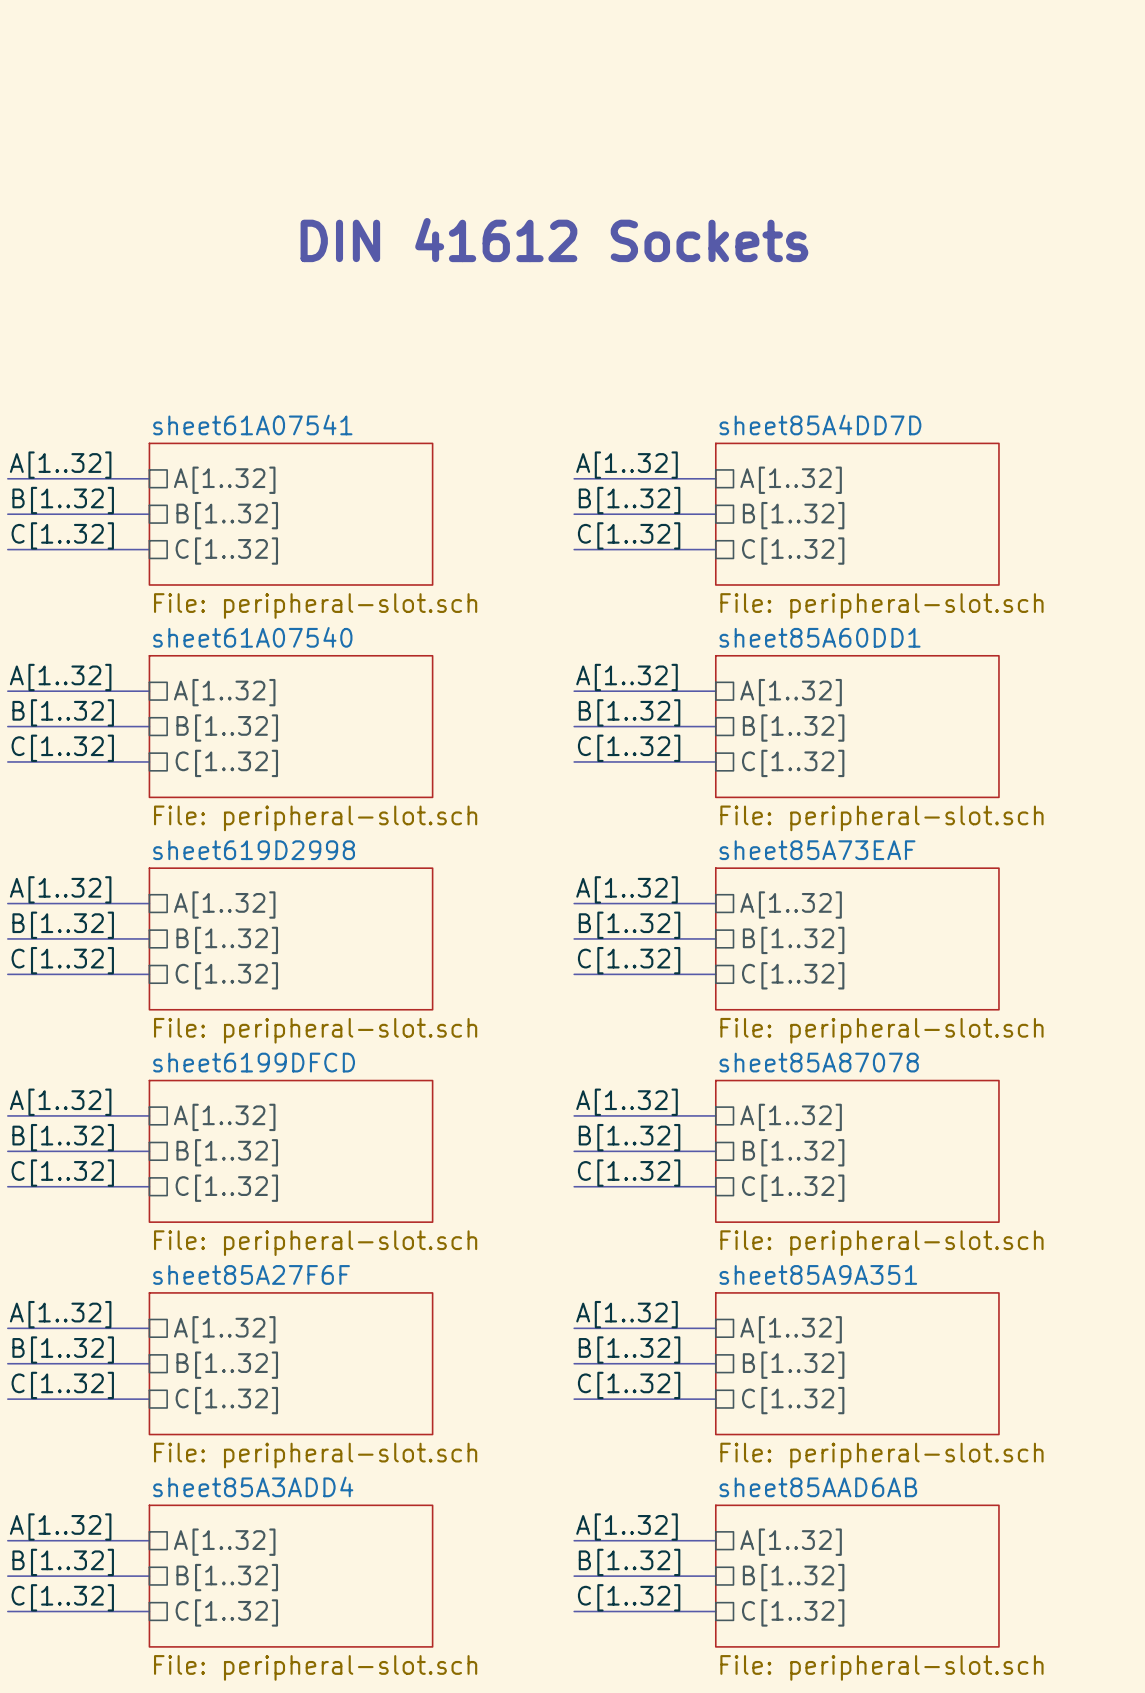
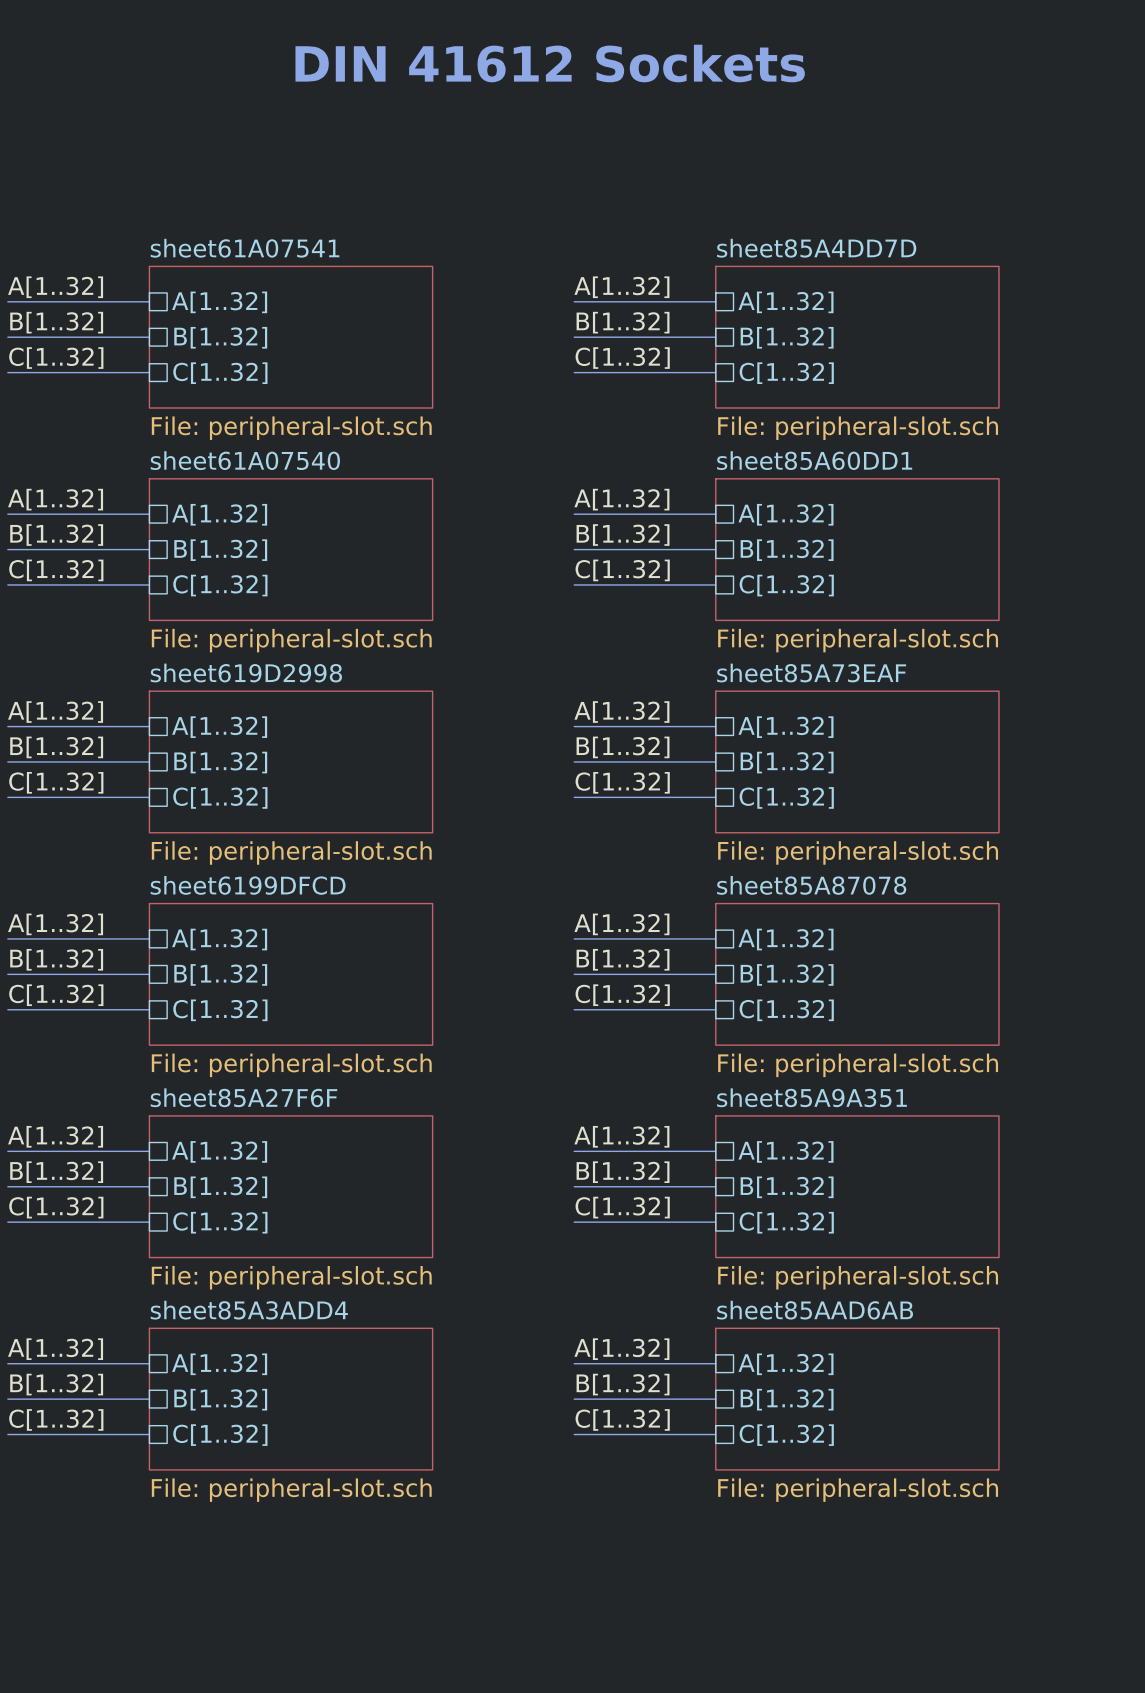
text position: DIN 41612 Sockets (554, 240) -> DIN 41612 Sockets (550, 63)
bus: none -> (7, 301) (149, 301)
bus: none -> (574, 301) (715, 301)
label: none -> B[1..32] (56, 322)
label: none -> B[1..32] (623, 322)
bus: none -> (7, 337) (149, 337)
bus: none -> (574, 337) (715, 337)
sheet pin: none -> B[1..32] (220, 337)
sheet pin: none -> B[1..32] (787, 337)
label: none -> C[1..32] (56, 358)
label: none -> C[1..32] (622, 358)
sheet pin: none -> C[1..32] (220, 373)
sheet pin: none -> C[1..32] (786, 373)
label position: A[1..32] (60, 465) -> A[1..32] (55, 287)
label position: A[1..32] (627, 465) -> A[1..32] (621, 287)
bus: (7, 478) (149, 478) -> (7, 372) (149, 372)
bus: (574, 478) (715, 478) -> (574, 372) (715, 372)
sheet pin position: A[1..32] (224, 480) -> A[1..32] (219, 302)
sheet pin position: A[1..32] (791, 480) -> A[1..32] (785, 302)
label: B[1..32] (63, 500) -> A[1..32] (55, 499)
label: B[1..32] (629, 500) -> A[1..32] (621, 499)
sheet sheet61A07541 position: (291, 514) -> (291, 337)
sheet sheet85A4DD7D position: (857, 514) -> (857, 337)
sheet pin: B[1..32] (227, 515) -> A[1..32] (219, 514)
sheet pin: B[1..32] (793, 515) -> A[1..32] (785, 514)
label: C[1..32] (62, 535) -> B[1..32] (56, 535)
label: C[1..32] (629, 535) -> B[1..32] (623, 535)
sheet pin: C[1..32] (226, 551) -> B[1..32] (220, 550)
sheet pin: C[1..32] (793, 551) -> B[1..32] (787, 550)
label: none -> C[1..32] (56, 570)
label: none -> C[1..32] (622, 570)
sheet pin: none -> C[1..32] (220, 585)
sheet pin: none -> C[1..32] (786, 585)
label: A[1..32] (60, 677) -> none
label: A[1..32] (627, 677) -> none
bus: (7, 691) (149, 691) -> (7, 584) (149, 584)
bus: (574, 691) (715, 691) -> (574, 584) (715, 584)
sheet pin: A[1..32] (224, 692) -> none
sheet pin: A[1..32] (791, 692) -> none
label: B[1..32] (63, 712) -> A[1..32] (55, 712)
label: B[1..32] (629, 712) -> A[1..32] (621, 712)
sheet sheet61A07540 position: (291, 726) -> (291, 549)
sheet sheet85A60DD1 position: (857, 726) -> (857, 549)
sheet pin: B[1..32] (227, 728) -> A[1..32] (219, 727)
sheet pin: B[1..32] (793, 728) -> A[1..32] (785, 727)
label: C[1..32] (62, 748) -> B[1..32] (56, 747)
label: C[1..32] (629, 748) -> B[1..32] (623, 747)
sheet pin: C[1..32] (226, 763) -> B[1..32] (220, 762)
sheet pin: C[1..32] (793, 763) -> B[1..32] (787, 762)
label: none -> C[1..32] (56, 782)
label: none -> C[1..32] (622, 782)
sheet pin: none -> C[1..32] (220, 797)
sheet pin: none -> C[1..32] (786, 797)
label: A[1..32] (60, 889) -> none
label: A[1..32] (627, 889) -> none
bus: (7, 903) (149, 903) -> (7, 797) (149, 797)
bus: (574, 903) (715, 903) -> (574, 797) (715, 797)
sheet pin: A[1..32] (224, 905) -> none
sheet pin: A[1..32] (791, 905) -> none
label: B[1..32] (63, 925) -> A[1..32] (55, 924)
label: B[1..32] (629, 925) -> A[1..32] (621, 924)
sheet sheet619D2998 position: (291, 938) -> (291, 761)
sheet sheet85A73EAF position: (857, 938) -> (857, 761)
sheet pin: B[1..32] (227, 940) -> A[1..32] (219, 939)
sheet pin: B[1..32] (793, 940) -> A[1..32] (785, 939)
label: C[1..32] (62, 960) -> B[1..32] (56, 959)
label: C[1..32] (629, 960) -> B[1..32] (623, 959)
sheet pin: C[1..32] (226, 975) -> B[1..32] (220, 974)
sheet pin: C[1..32] (793, 975) -> B[1..32] (787, 974)
label: none -> C[1..32] (56, 995)
label: none -> C[1..32] (622, 995)
sheet pin: none -> C[1..32] (220, 1010)
sheet pin: none -> C[1..32] (786, 1010)
label: A[1..32] (60, 1102) -> none
label: A[1..32] (627, 1102) -> none
bus: (7, 1115) (149, 1115) -> (7, 1009) (149, 1009)
bus: (574, 1115) (715, 1115) -> (574, 1009) (715, 1009)
sheet pin: A[1..32] (224, 1117) -> none
sheet pin: A[1..32] (791, 1117) -> none
label: B[1..32] (63, 1137) -> A[1..32] (55, 1136)
label: B[1..32] (629, 1137) -> A[1..32] (621, 1136)
sheet sheet6199DFCD position: (291, 1151) -> (291, 974)
sheet sheet85A87078 position: (857, 1151) -> (857, 974)
sheet pin: B[1..32] (227, 1152) -> A[1..32] (219, 1151)
sheet pin: B[1..32] (793, 1152) -> A[1..32] (785, 1151)
label: C[1..32] (62, 1173) -> B[1..32] (56, 1172)
label: C[1..32] (629, 1173) -> B[1..32] (623, 1172)
sheet pin: C[1..32] (226, 1188) -> B[1..32] (220, 1187)
sheet pin: C[1..32] (793, 1188) -> B[1..32] (787, 1187)
label: none -> C[1..32] (56, 1207)
label: none -> C[1..32] (622, 1207)
sheet pin: none -> C[1..32] (220, 1222)
sheet pin: none -> C[1..32] (786, 1222)
label: A[1..32] (60, 1314) -> none
label: A[1..32] (627, 1314) -> none
bus: (7, 1328) (149, 1328) -> (7, 1222) (149, 1222)
bus: (574, 1328) (715, 1328) -> (574, 1222) (715, 1222)
sheet pin: A[1..32] (224, 1329) -> none
sheet pin: A[1..32] (791, 1329) -> none
label: B[1..32] (63, 1350) -> A[1..32] (55, 1349)
label: B[1..32] (629, 1350) -> A[1..32] (621, 1349)
sheet sheet85A27F6F position: (291, 1363) -> (291, 1186)
sheet sheet85A9A351 position: (857, 1363) -> (857, 1186)
sheet pin: B[1..32] (227, 1365) -> A[1..32] (219, 1364)
sheet pin: B[1..32] (793, 1365) -> A[1..32] (785, 1364)
label: C[1..32] (62, 1385) -> B[1..32] (56, 1384)
label: C[1..32] (629, 1385) -> B[1..32] (623, 1384)
sheet pin: C[1..32] (226, 1400) -> B[1..32] (220, 1399)
sheet pin: C[1..32] (793, 1400) -> B[1..32] (787, 1399)
label: A[1..32] (60, 1527) -> none
label: A[1..32] (627, 1527) -> none
bus: (7, 1540) (149, 1540) -> (7, 1434) (149, 1434)
bus: (574, 1540) (715, 1540) -> (574, 1434) (715, 1434)
sheet pin: A[1..32] (224, 1542) -> none
sheet pin: A[1..32] (791, 1542) -> none
label: B[1..32] (63, 1562) -> none
label: B[1..32] (629, 1562) -> none
bus: (7, 1576) (149, 1576) -> none
sheet sheet85A3ADD4 position: (291, 1576) -> (291, 1399)
bus: (574, 1576) (715, 1576) -> none
sheet sheet85AAD6AB position: (857, 1576) -> (857, 1399)
sheet pin: B[1..32] (227, 1577) -> none
sheet pin: B[1..32] (793, 1577) -> none
label position: C[1..32] (62, 1597) -> C[1..32] (56, 1419)
label position: C[1..32] (629, 1597) -> C[1..32] (622, 1419)
bus: (7, 1611) (149, 1611) -> none
bus: (574, 1611) (715, 1611) -> none
sheet pin position: C[1..32] (226, 1612) -> C[1..32] (220, 1435)
sheet pin position: C[1..32] (793, 1612) -> C[1..32] (786, 1435)

